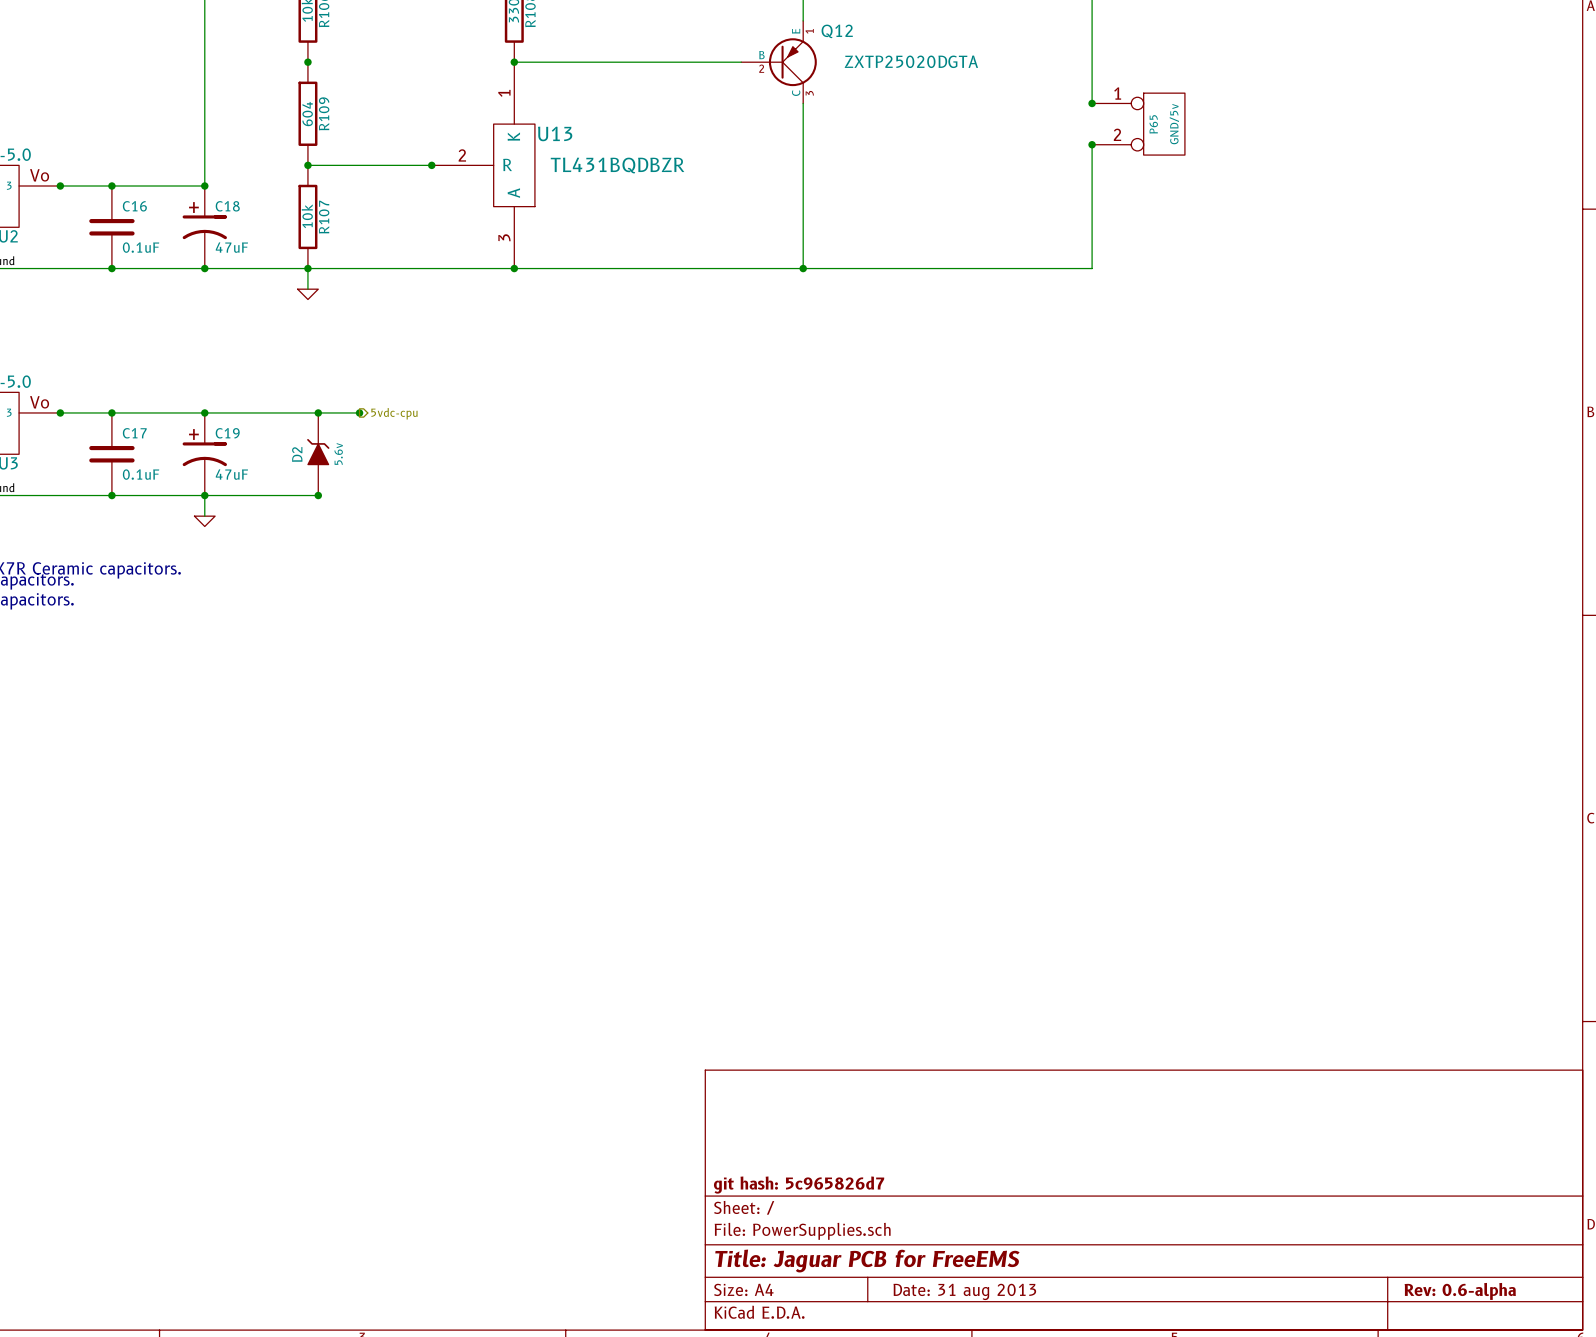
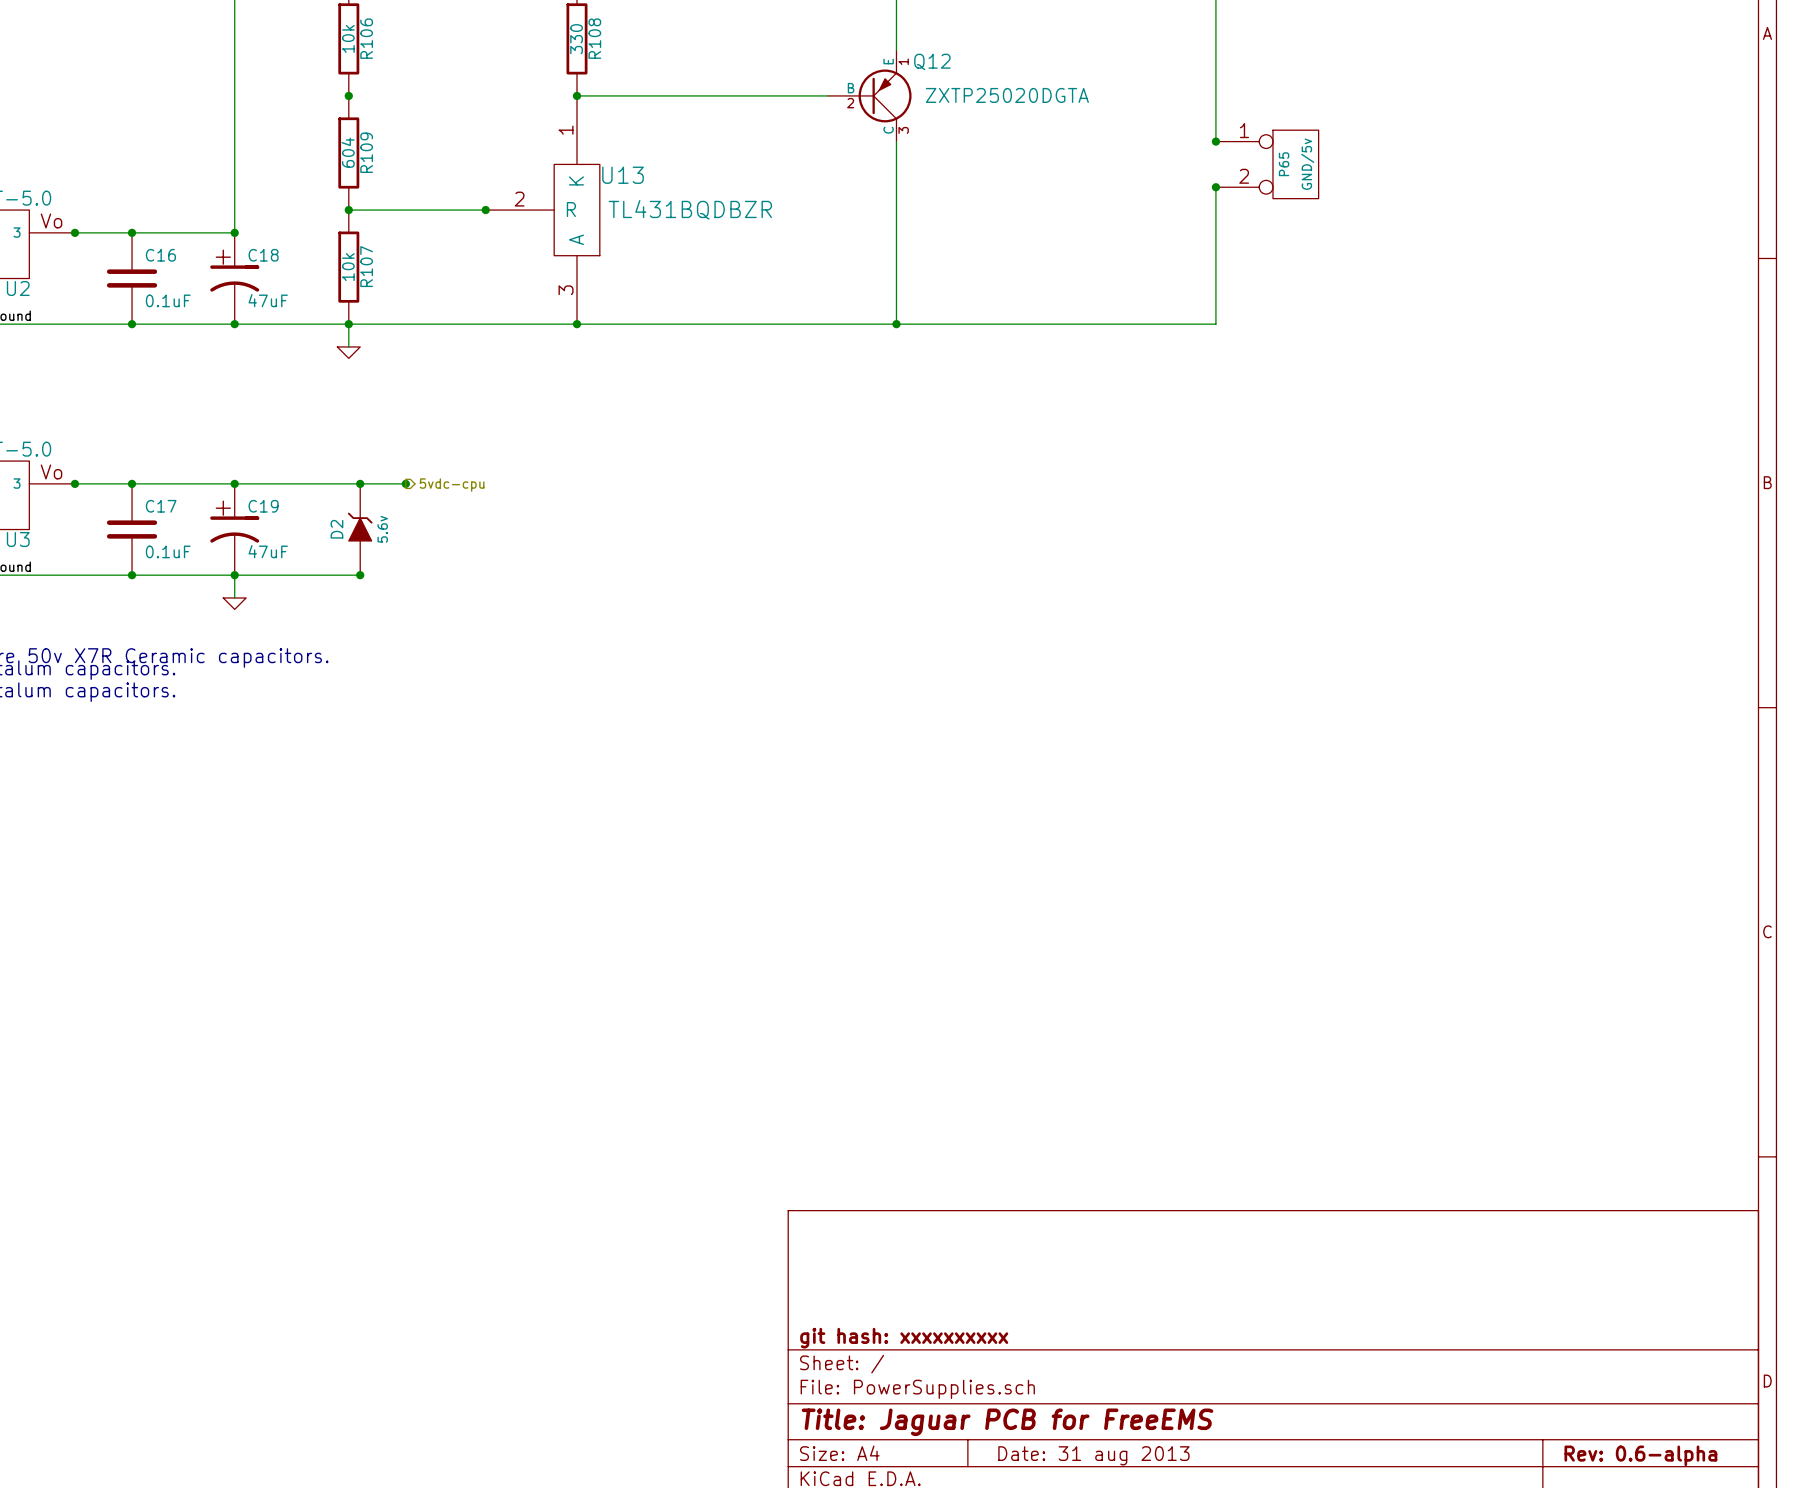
title block: git hash: 5c965826d7 (799, 1185) -> git hash: xxxxxxxxxx (904, 1338)

